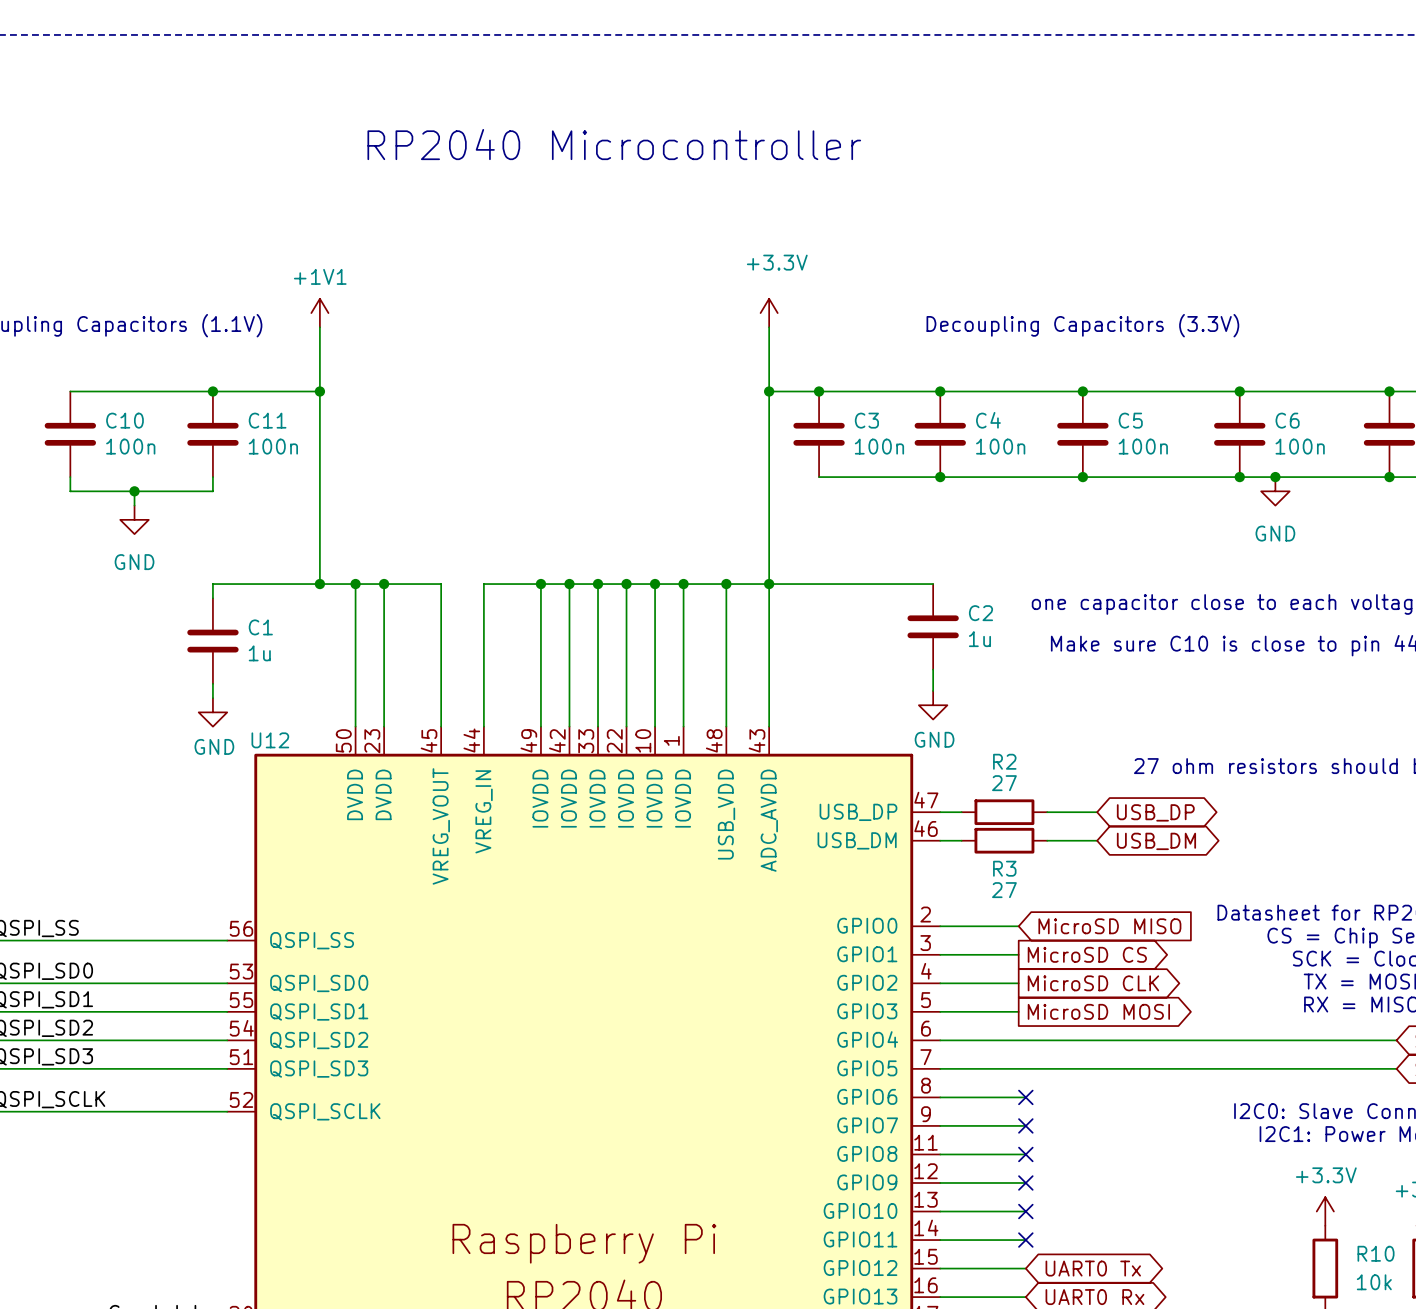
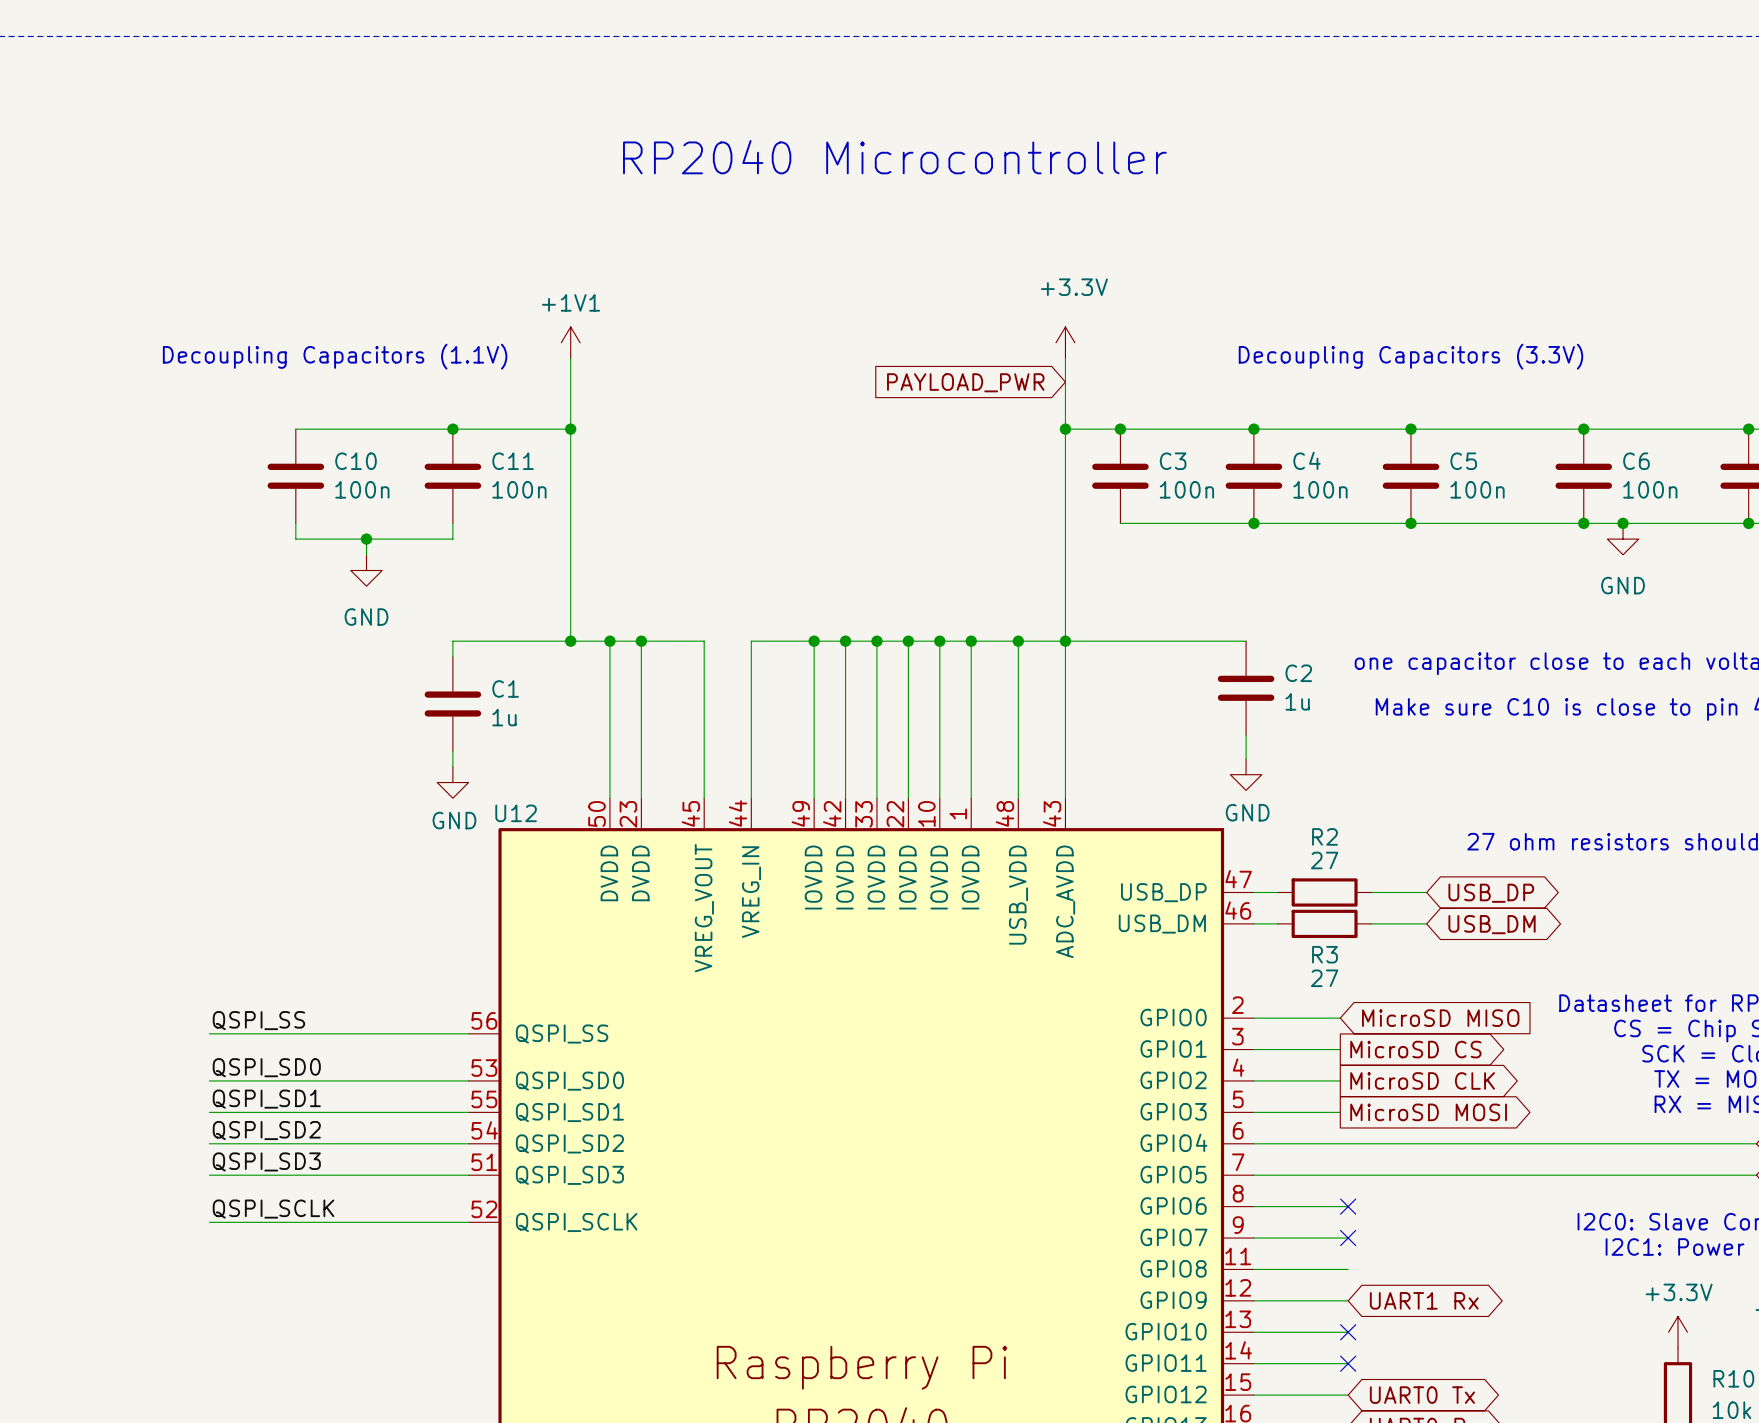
global label: none -> PAYLOAD_PWR (965, 382)
no-connect mark: (1025, 1154) -> none
no-connect mark: (1025, 1182) -> none
global label: none -> UART1 Rx (1424, 1300)

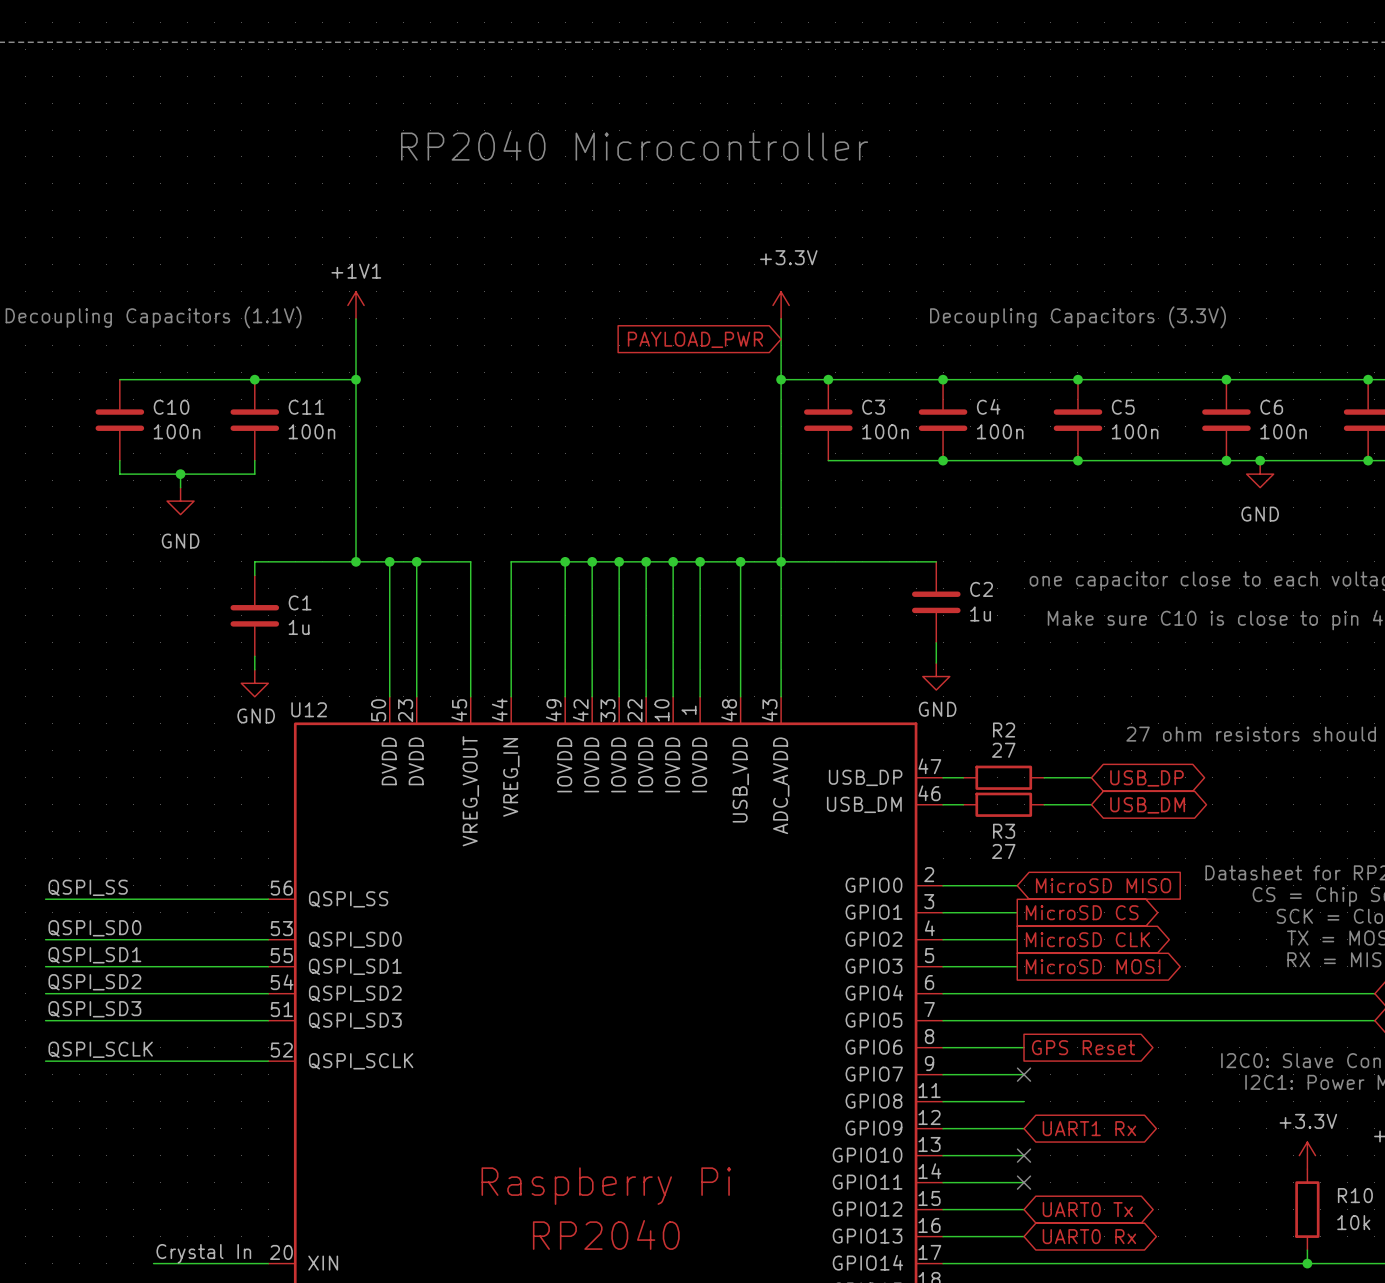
no-connect mark: (1348, 1206) -> none
global label: none -> GPS Reset (1083, 1047)

